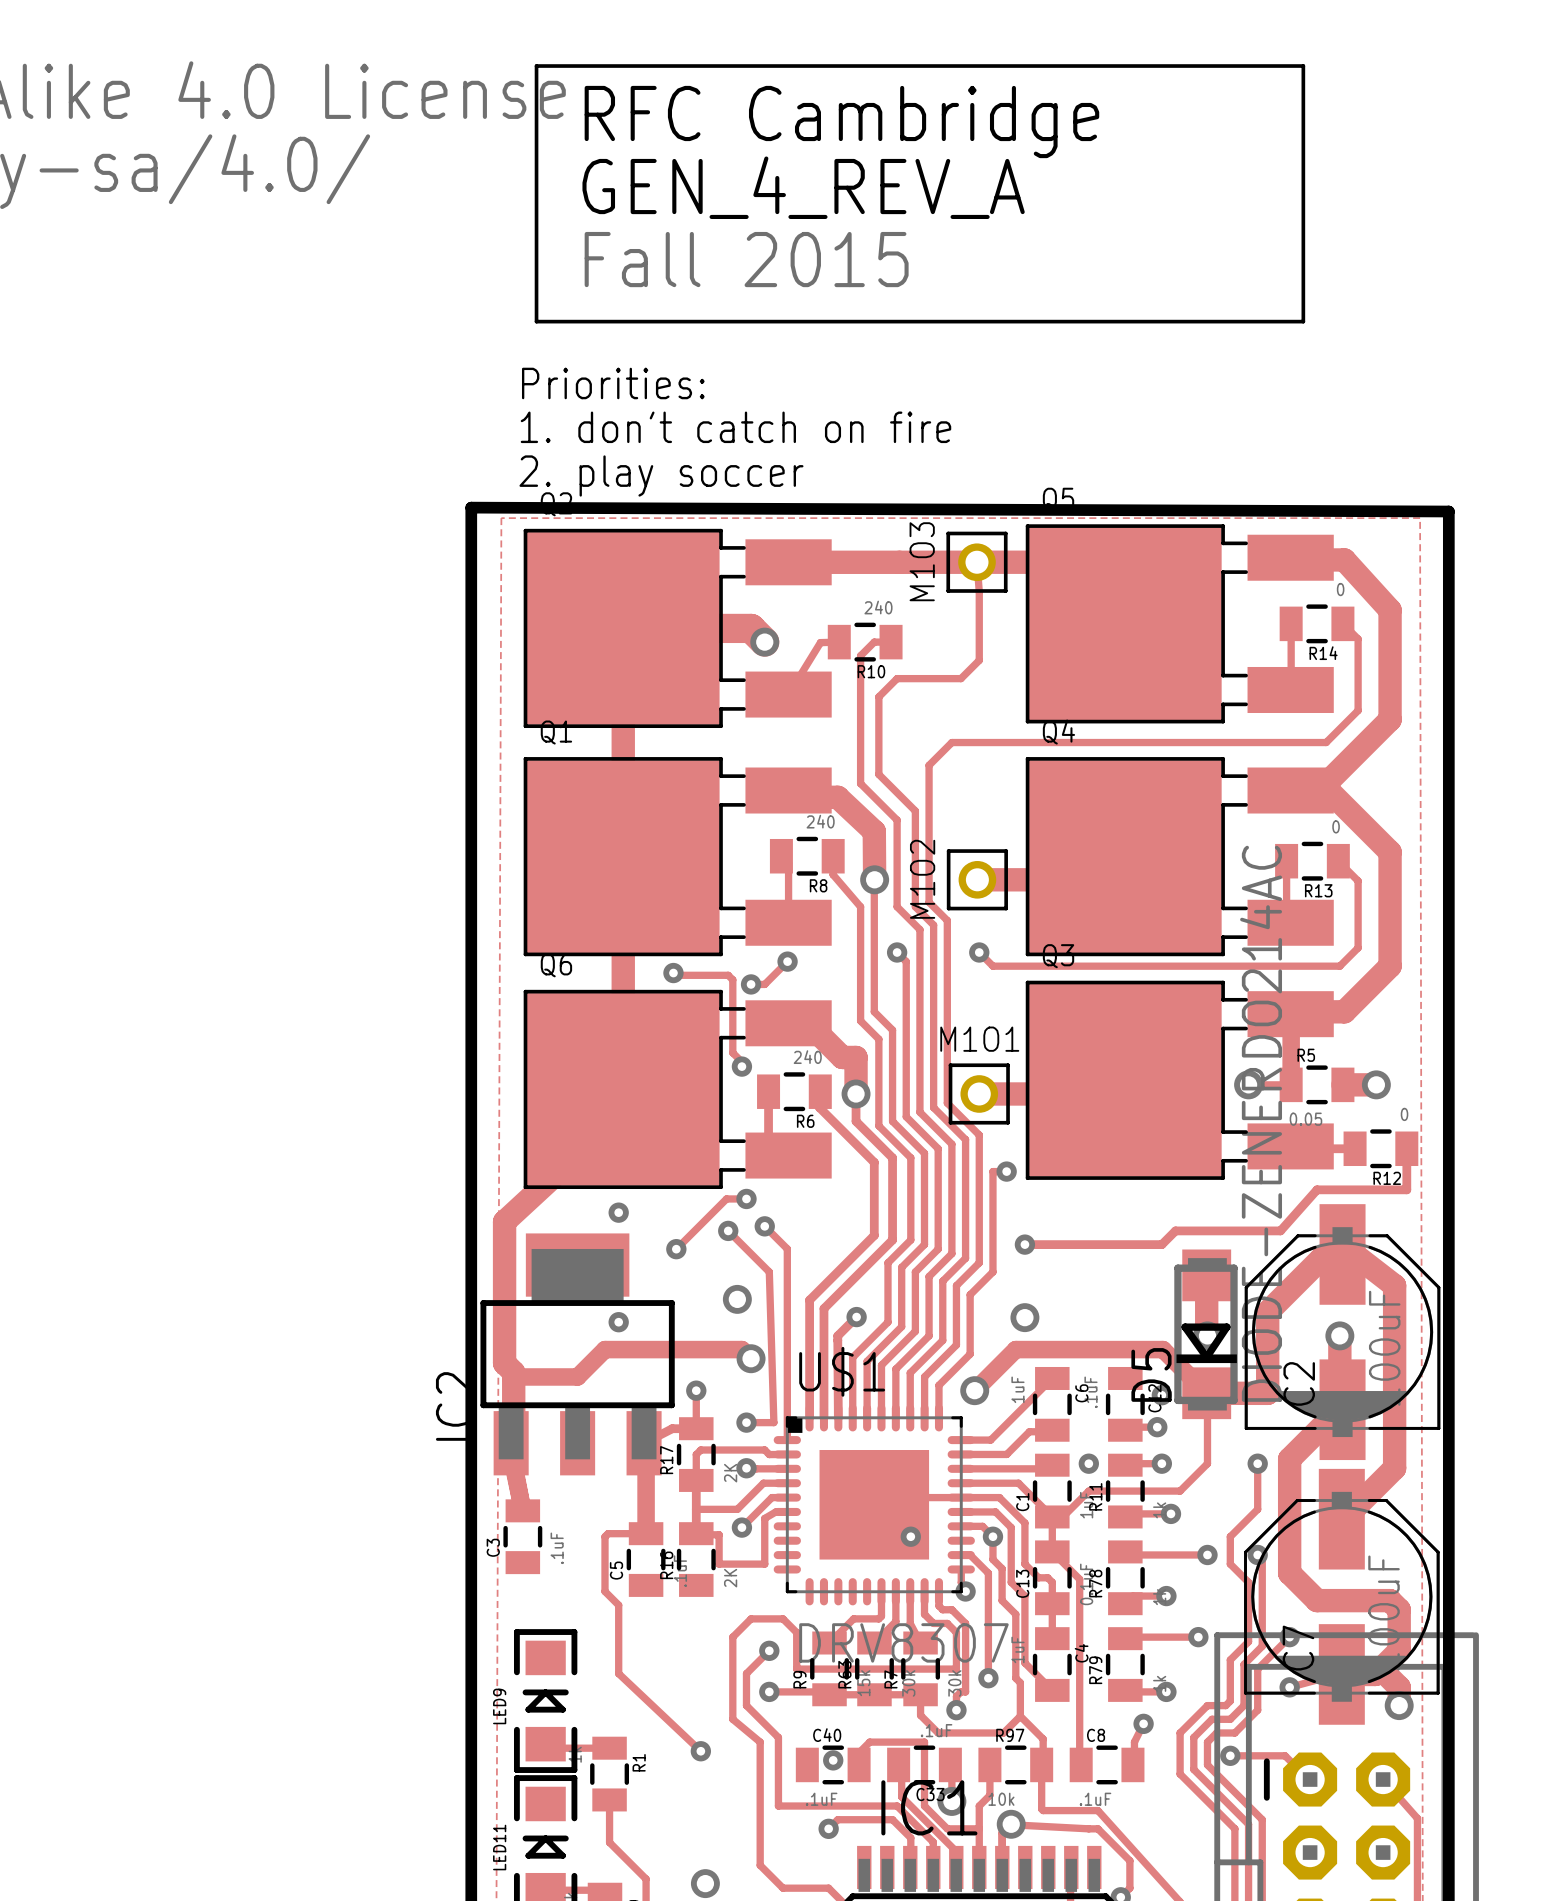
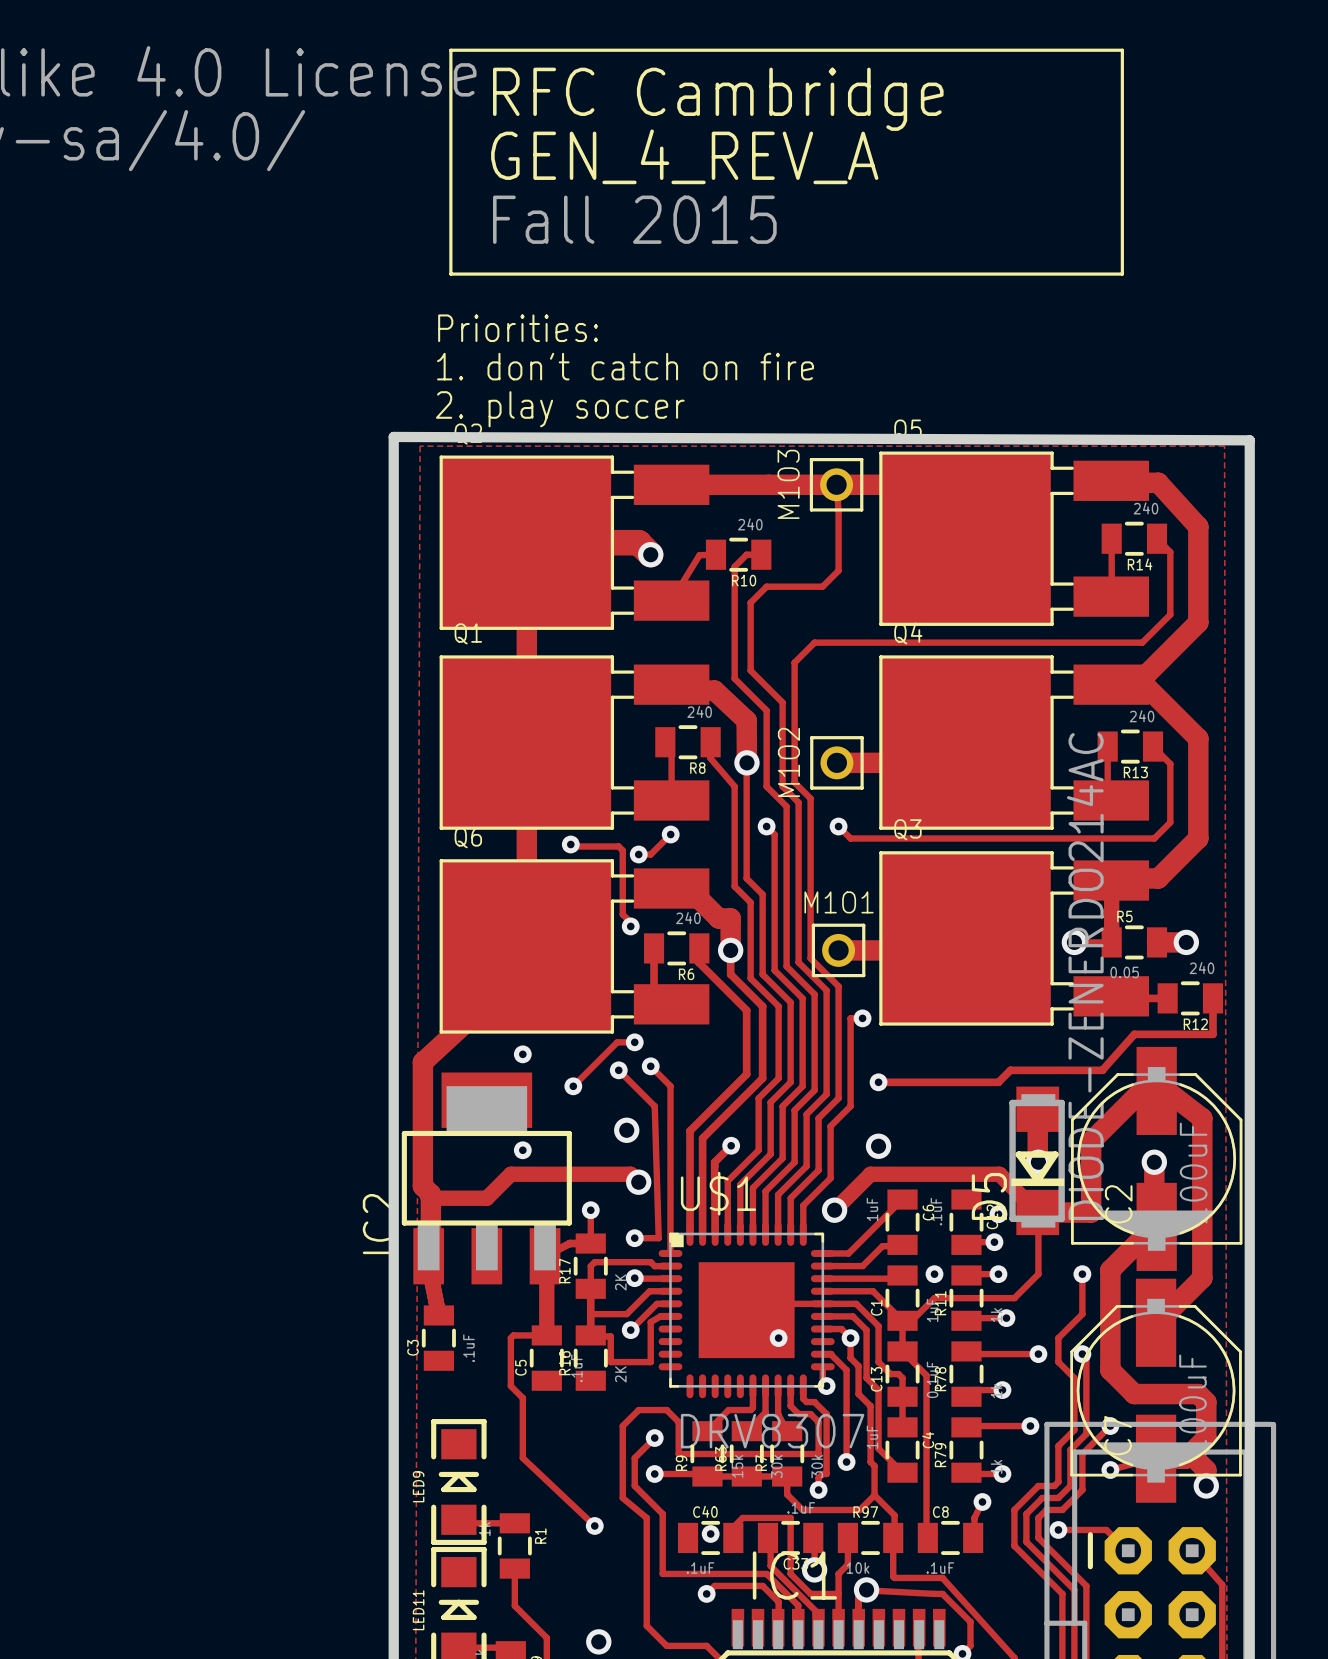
R14 value: 0 (1340, 589) -> 240 (1146, 508)
R13 value: 0 (1336, 826) -> 240 (1142, 716)
R12 value: 0 (1404, 1114) -> 240 (1201, 968)

